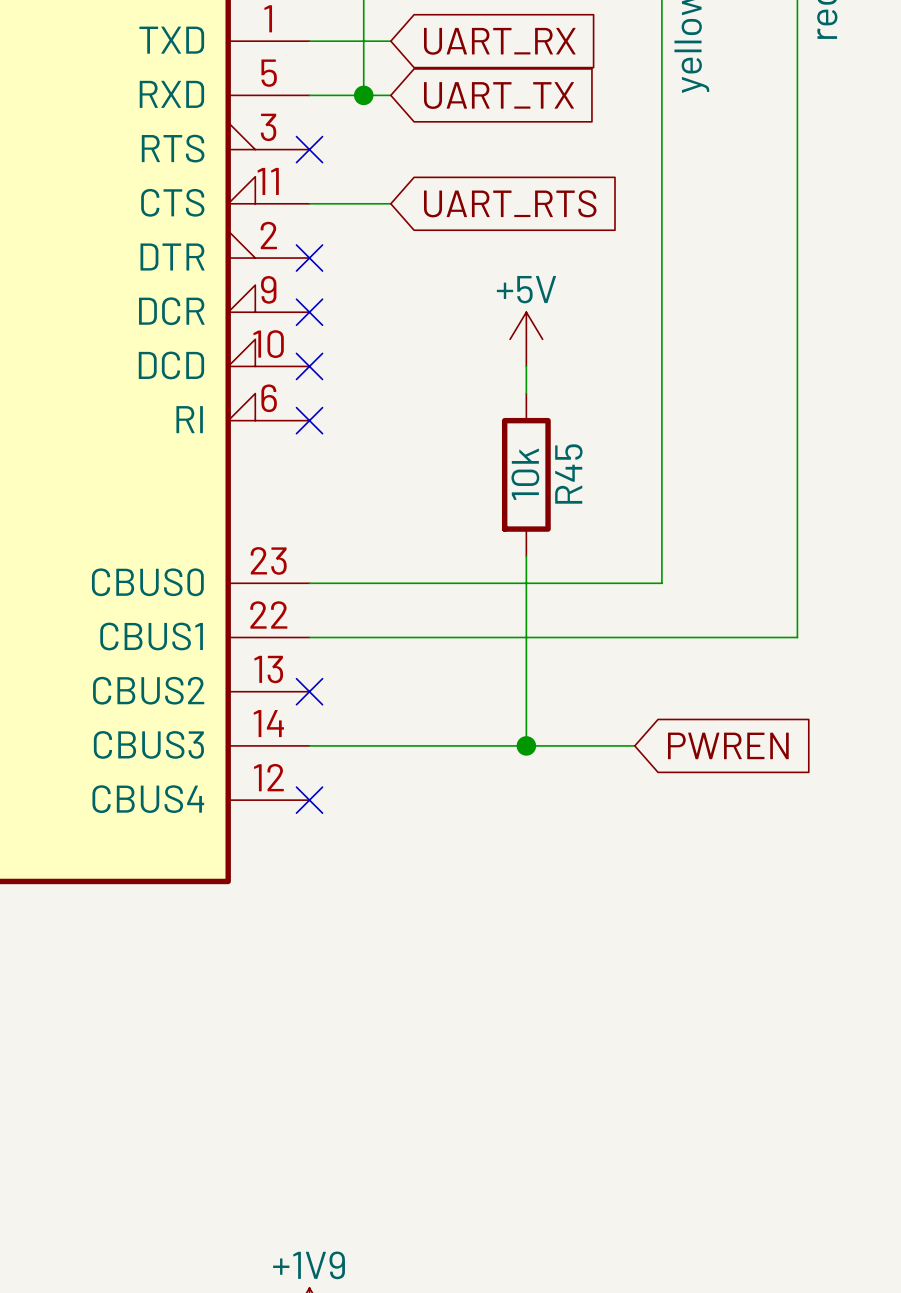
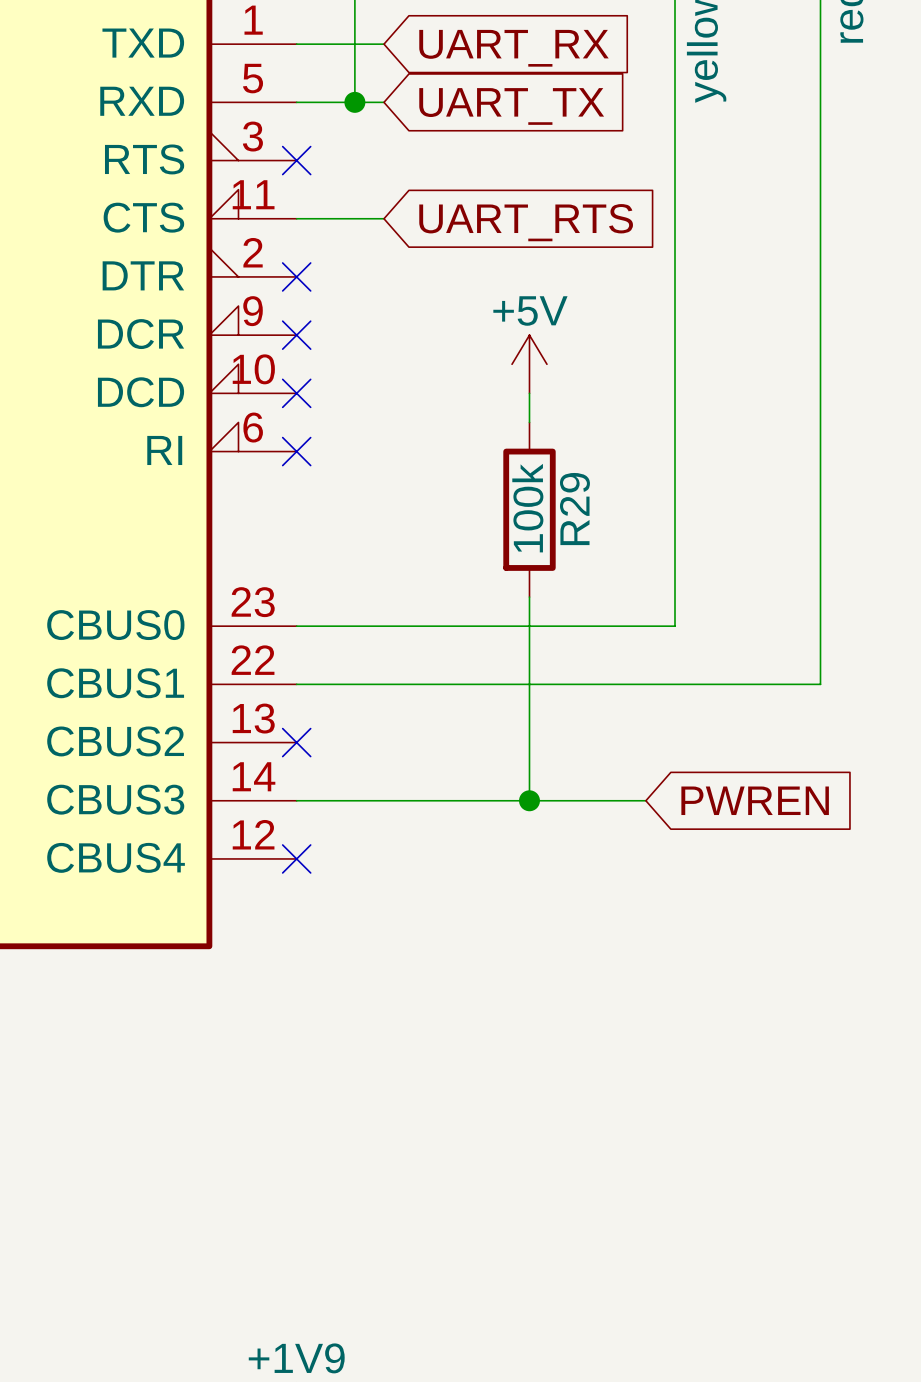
R45 value: 10k (525, 474) -> 100k (527, 508)
R45 name: R45 (568, 474) -> R29 (574, 509)

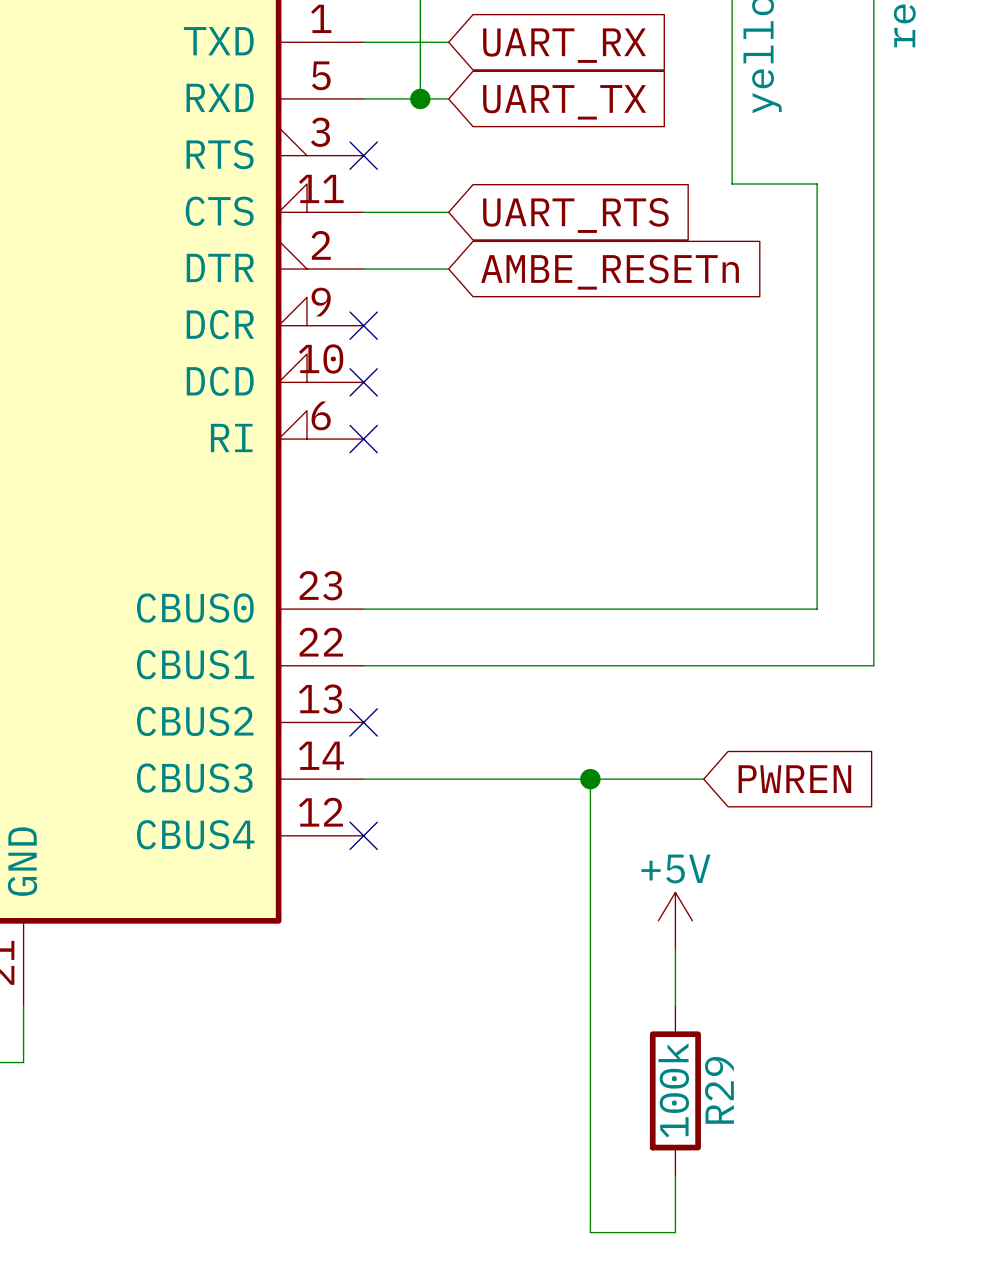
wire: (674, 189) (674, 626) -> (732, 183) (817, 183) (817, 609) (732, 609)
wire: none -> (363, 269) (448, 269)
no-connect mark: (296, 276) -> none
global label: none -> AMBE_RESETn (610, 272)
power symbol: +5V (529, 364) -> none
wire: (529, 393) (529, 422) -> none
R29 position: (529, 509) -> (675, 1090)
wire: (529, 597) (529, 800) -> (675, 1175) (675, 1232) (590, 1232) (590, 779)
power symbol: none -> +5V (675, 920)
wire: none -> (675, 949) (675, 1005)

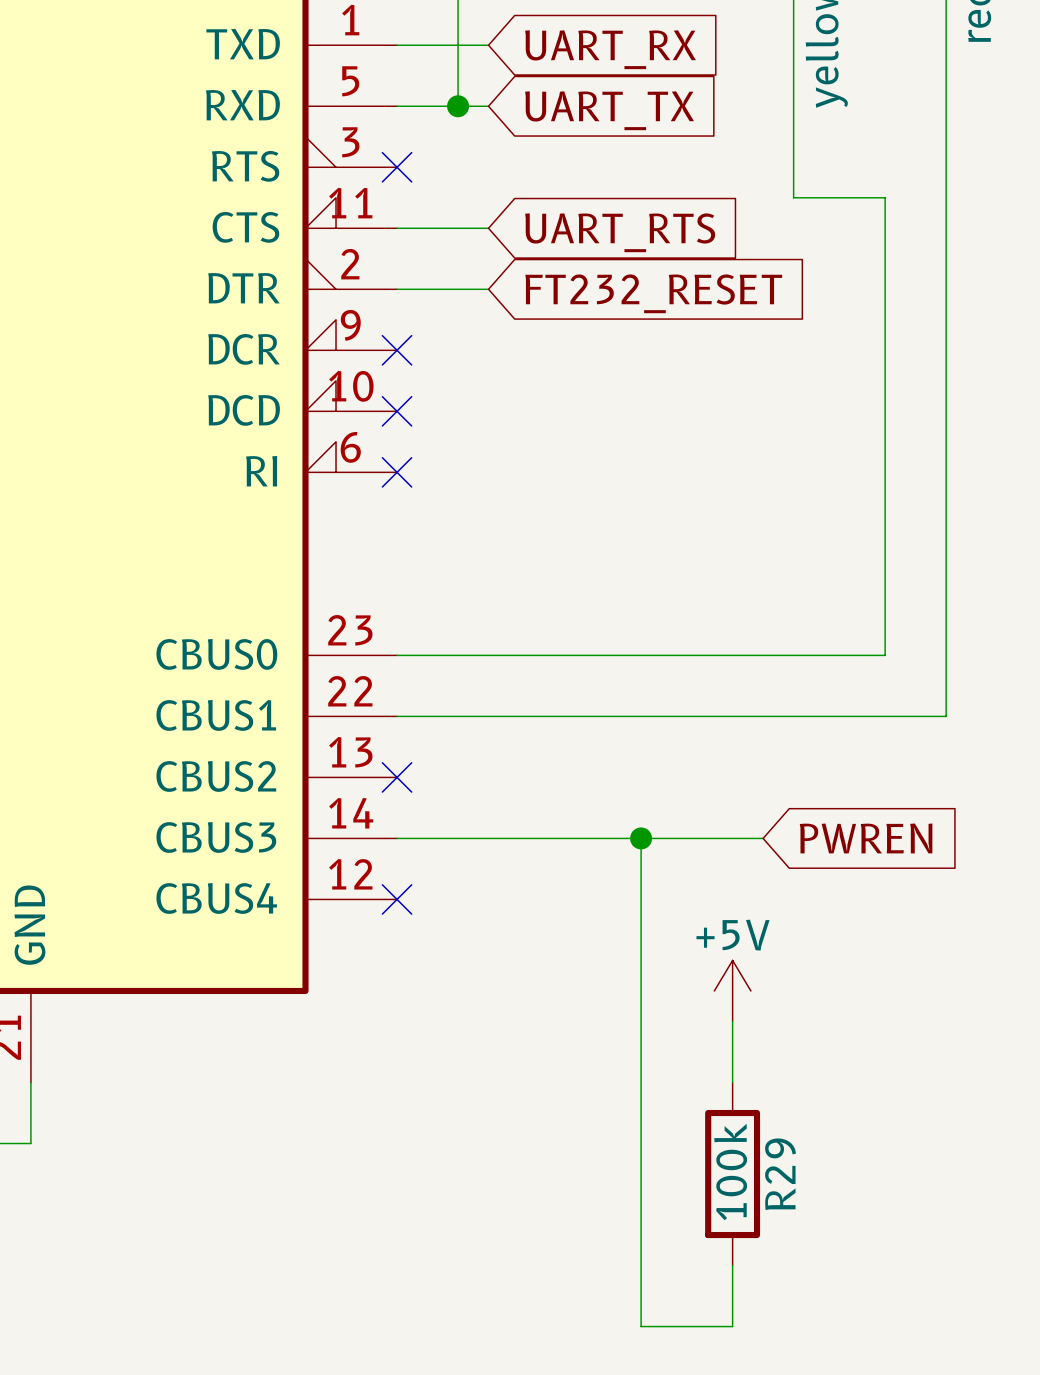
global label: AMBE_RESETn (610, 272) -> FT232_RESET (653, 293)

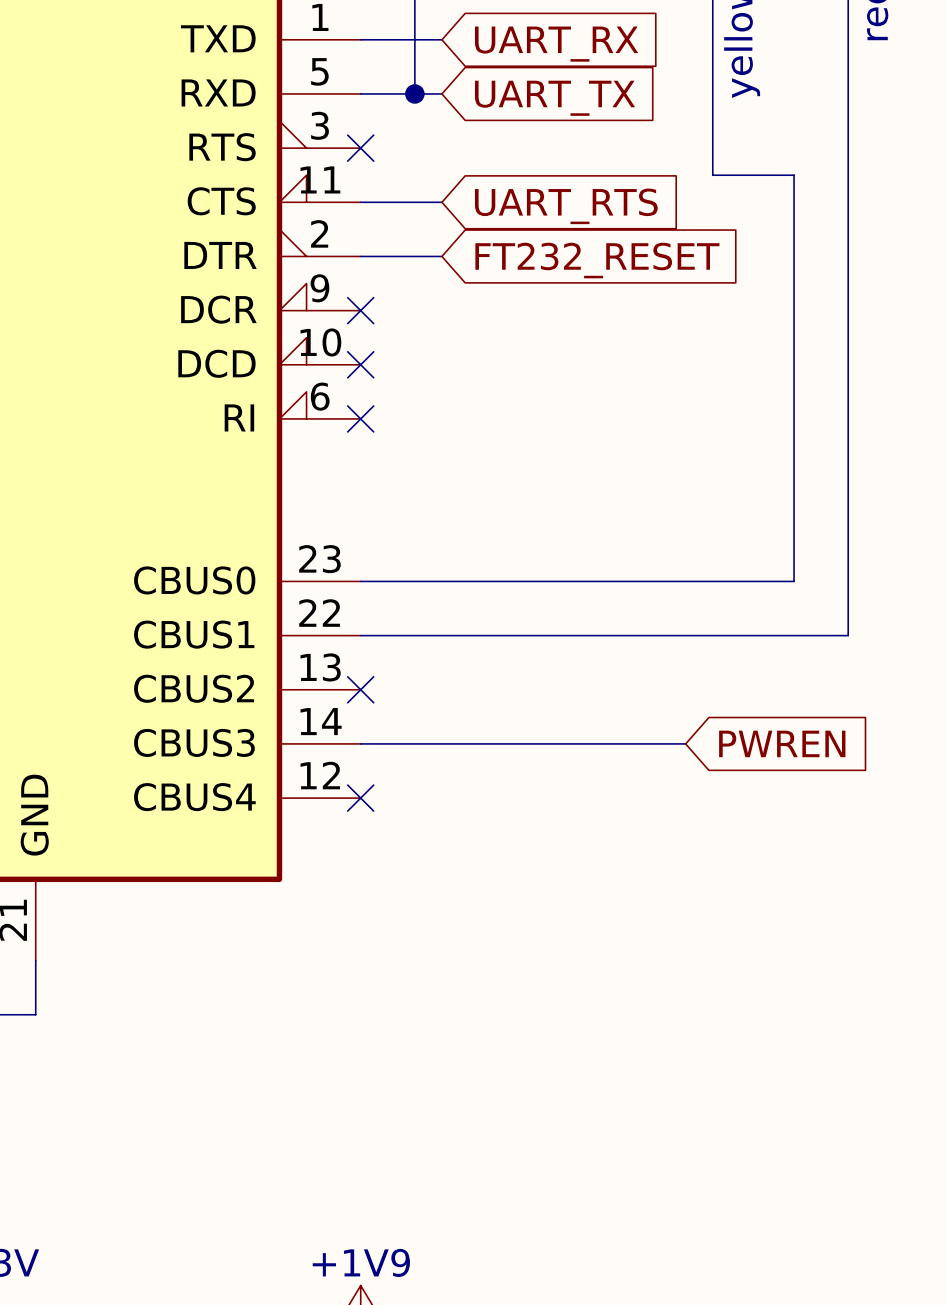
wire: (641, 838) (641, 1326) (732, 1326) (732, 1265) -> none
junction: (641, 838) -> none
power symbol: +5V (732, 990) -> none
wire: (732, 1021) (732, 1082) -> none
R29: 100k (732, 1174) -> none

